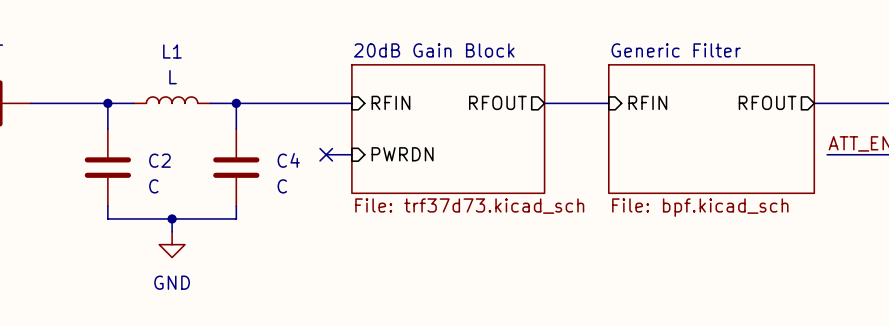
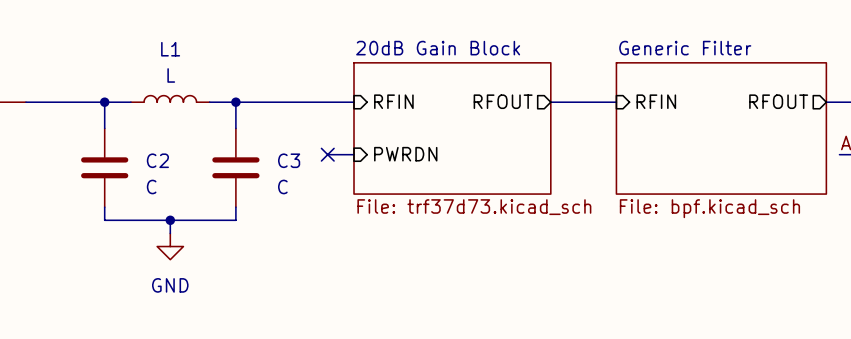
C4 name: C4 (288, 160) -> C3 (289, 160)

